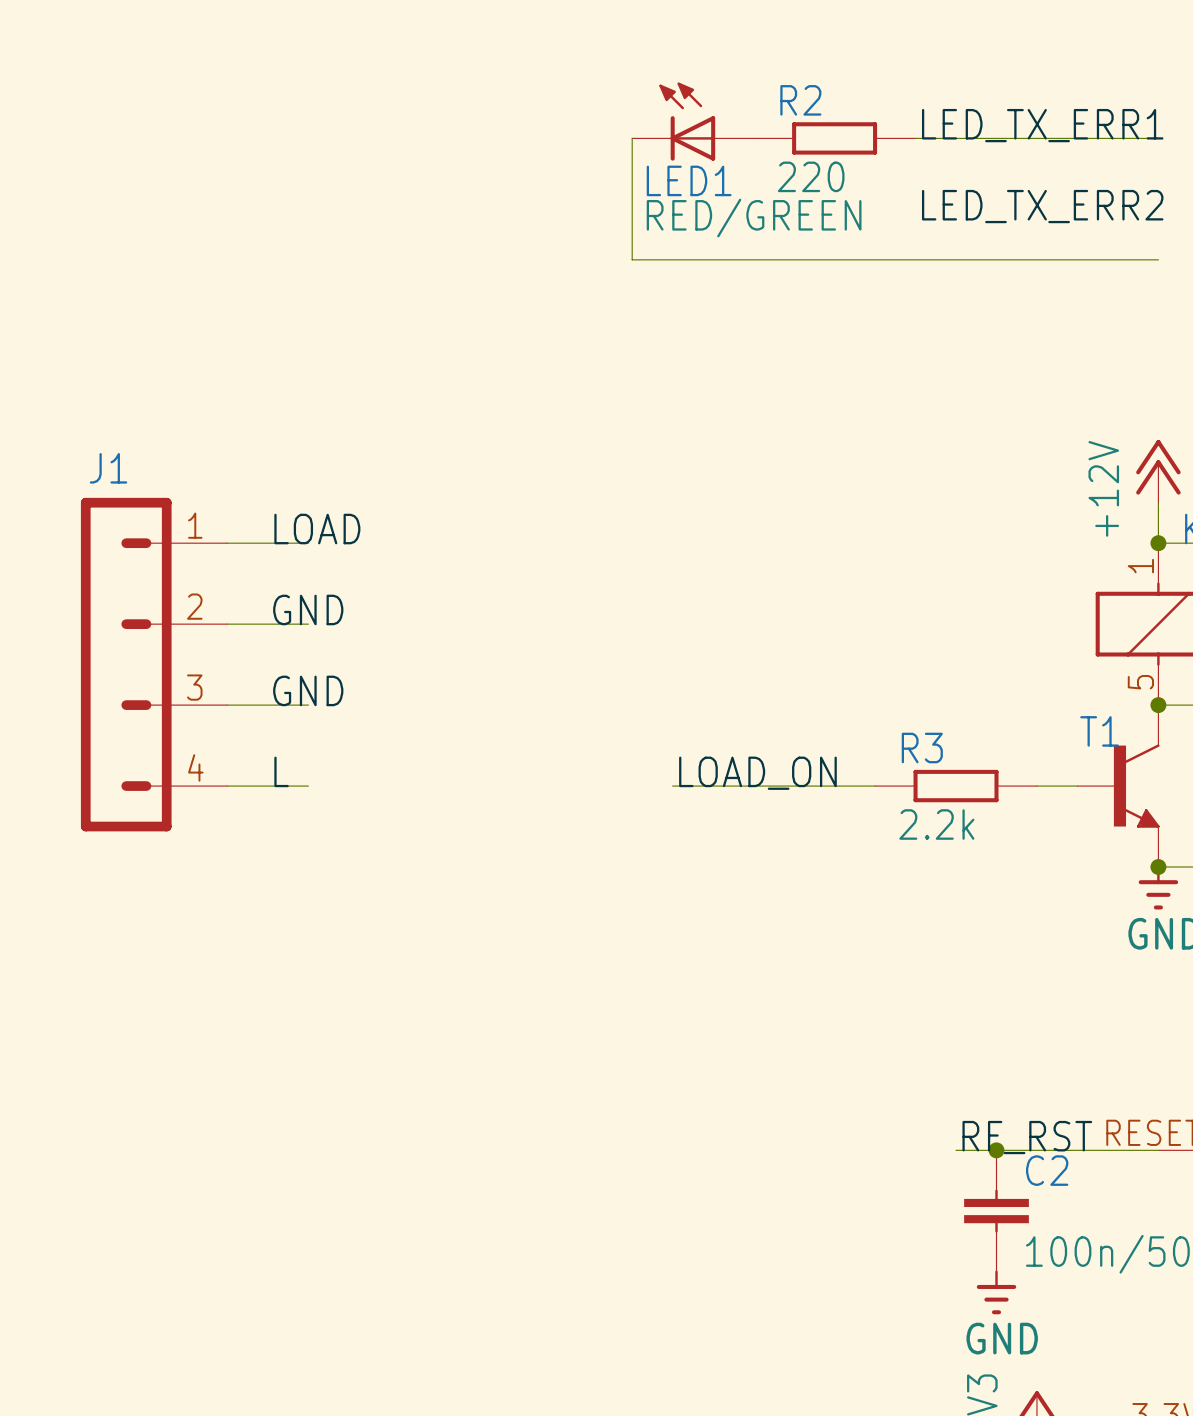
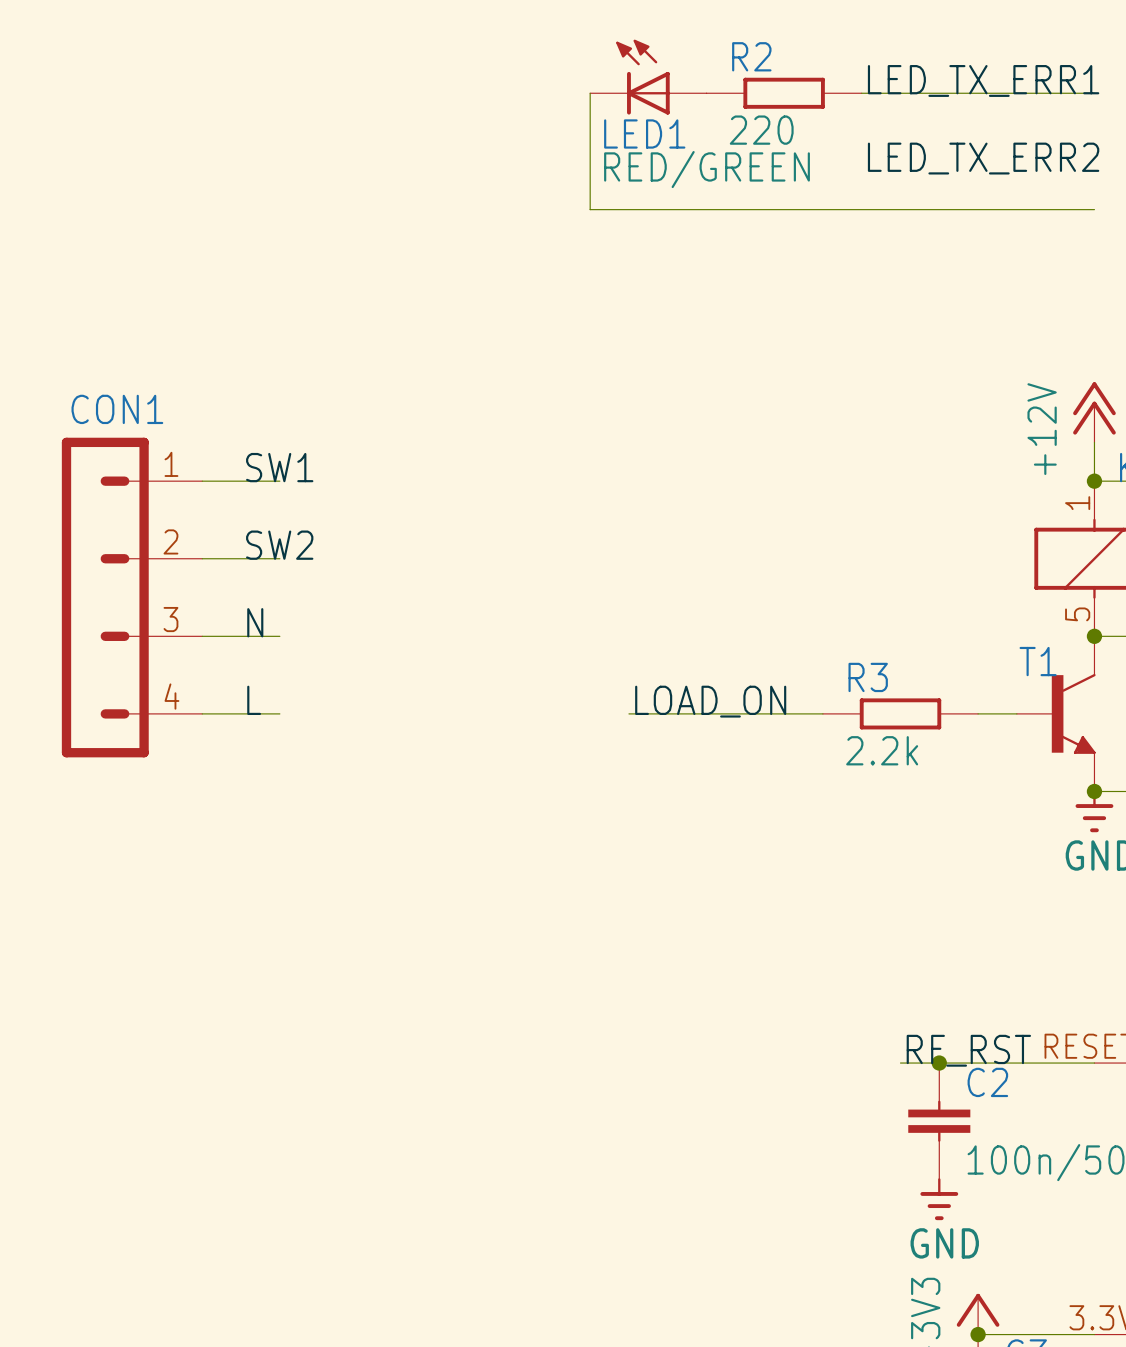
J1 name: J1 (108, 468) -> CON1 (117, 409)
label: LOAD (317, 529) -> SW1 (279, 467)
label: GND (308, 609) -> SW2 (279, 545)
label: GND (308, 690) -> N (255, 622)

